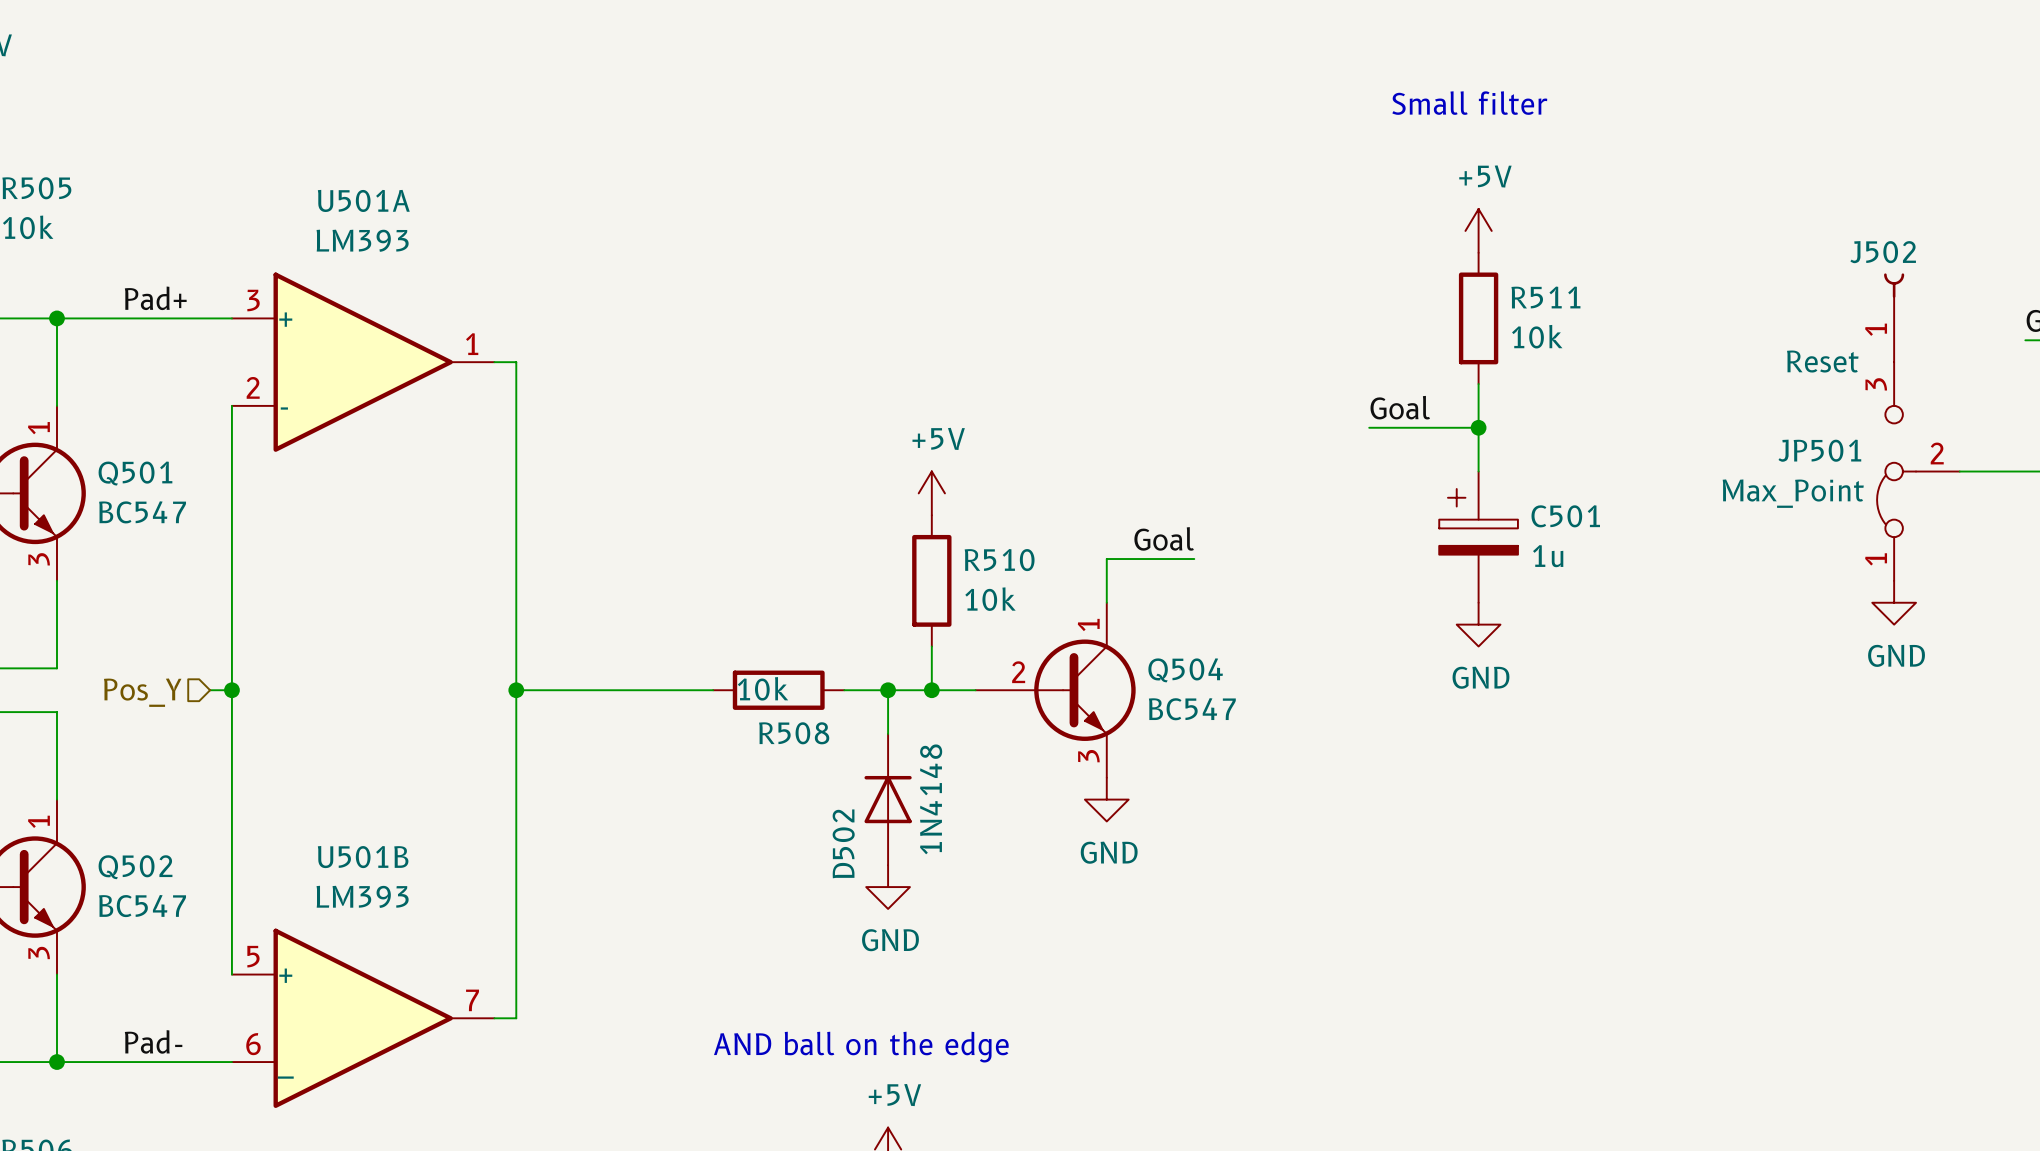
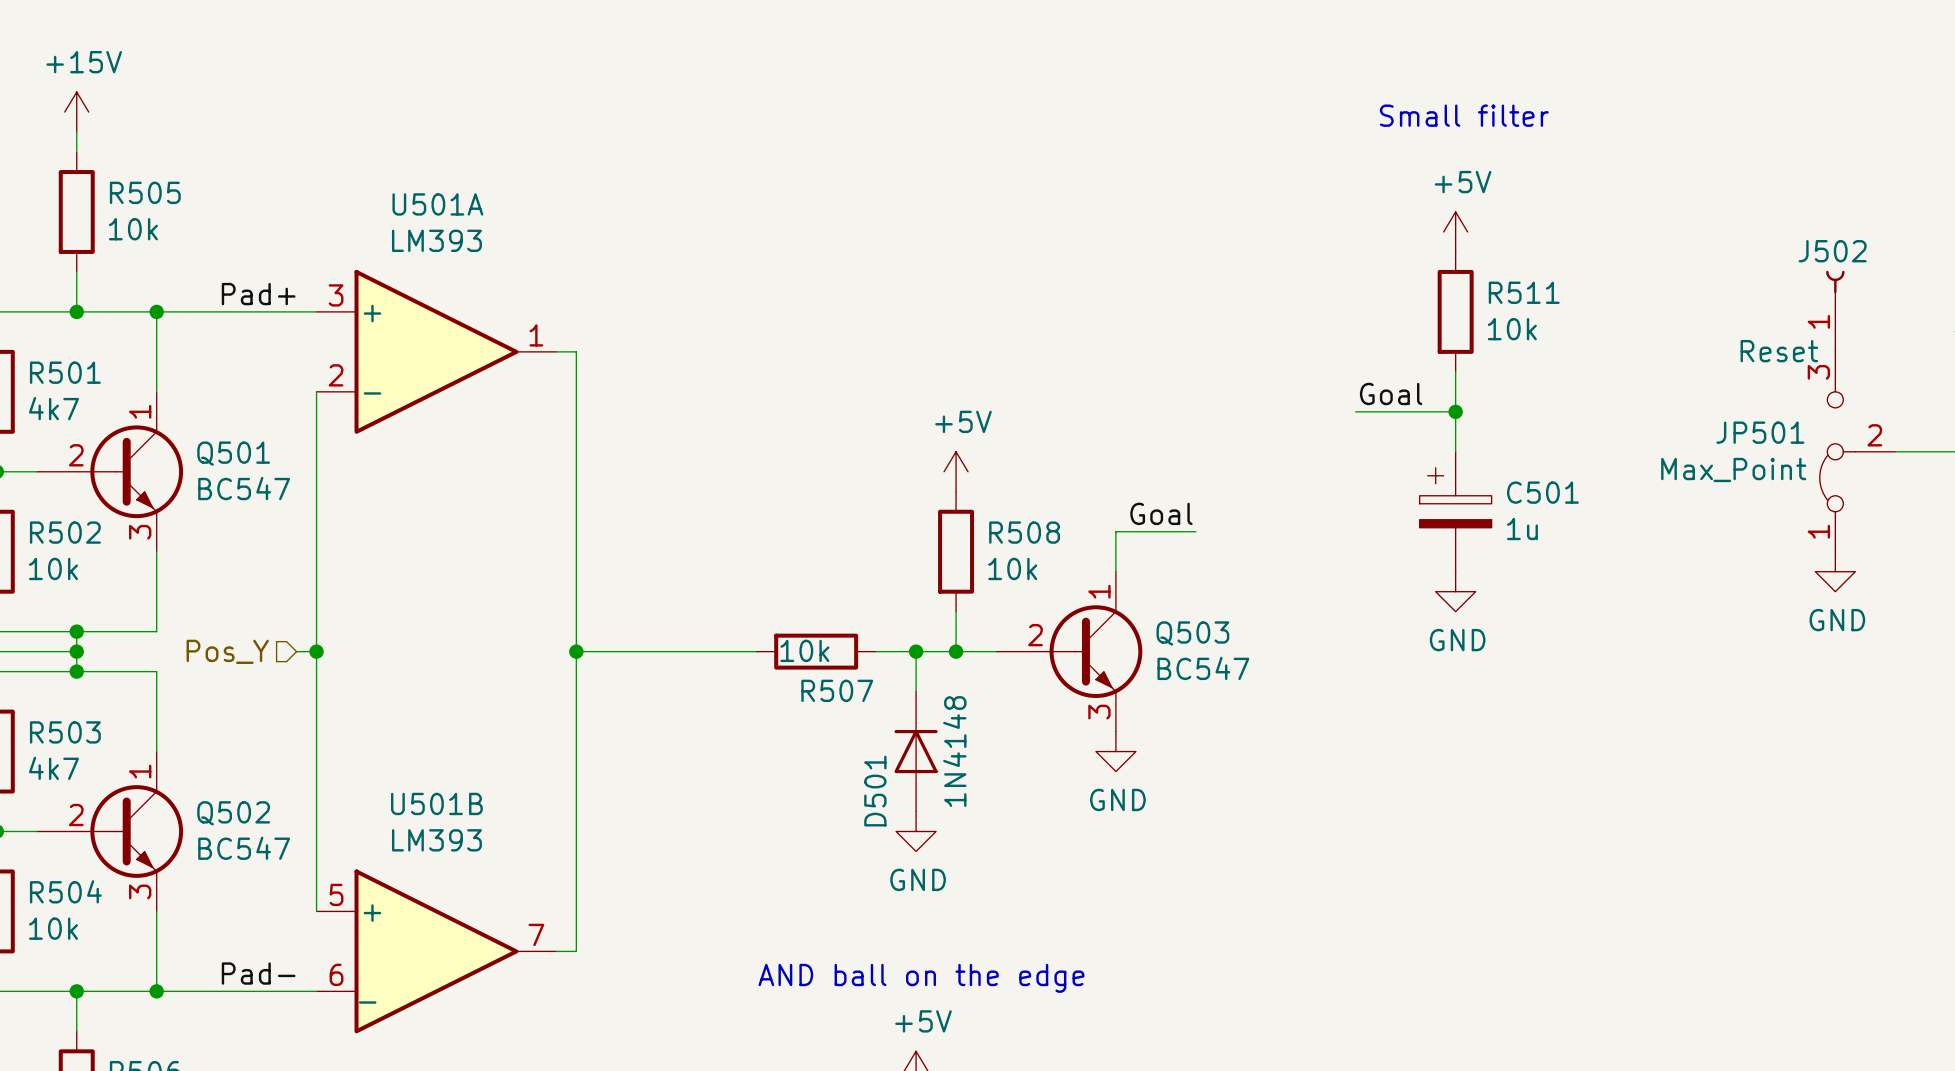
R510 name: R510 (999, 560) -> R508 (1024, 532)
Q504 name: Q504 (1185, 670) -> Q503 (1192, 633)
R508 name: R508 (794, 733) -> R507 (837, 690)
D502 name: D502 (843, 843) -> D501 (875, 791)

